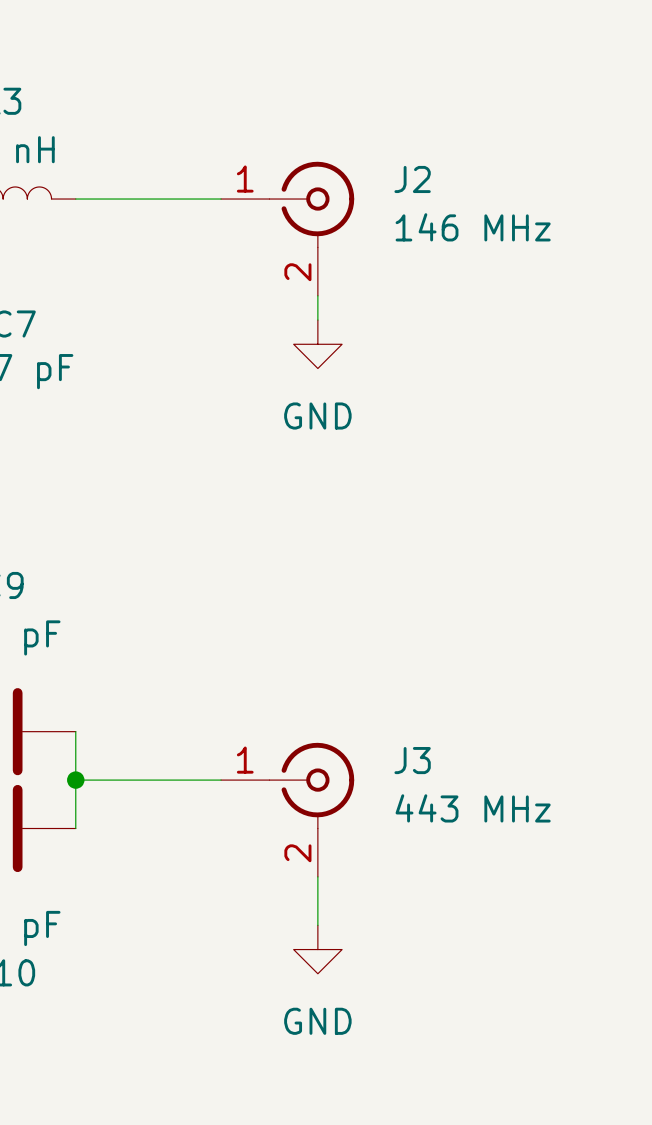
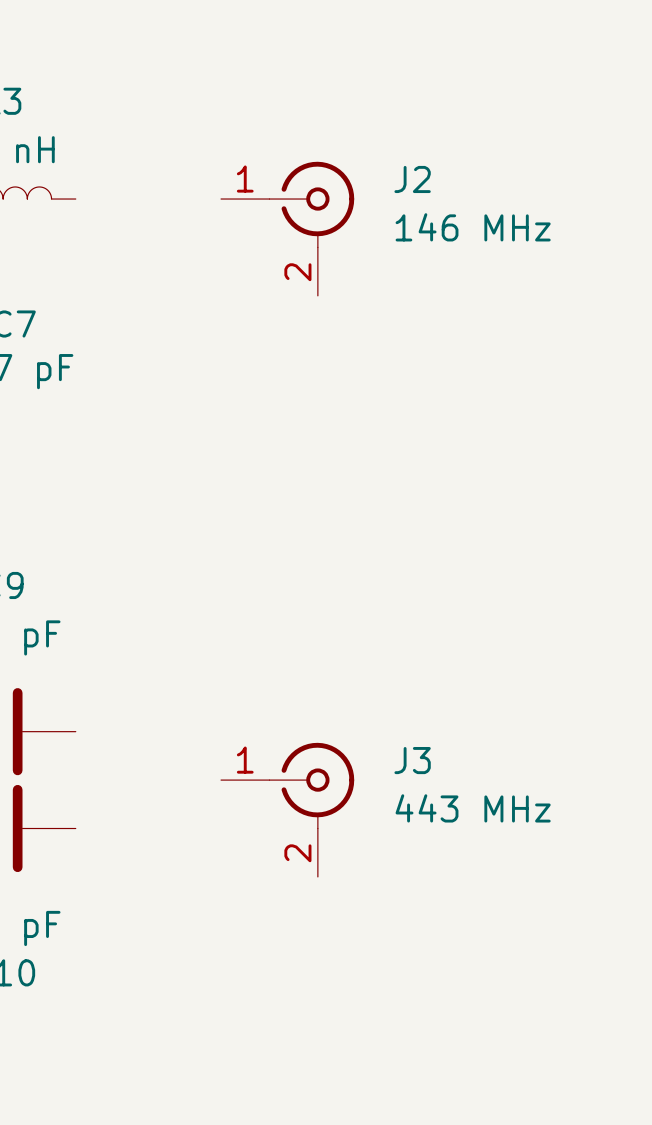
wire: (75, 199) (221, 199) -> none
wire: (317, 295) (317, 320) -> none
power symbol: GND (317, 344) -> none
wire: (75, 731) (75, 828) -> none
wire: (75, 780) (221, 780) -> none
junction: (75, 780) -> none
wire: (317, 876) (317, 925) -> none
power symbol: GND (317, 949) -> none

